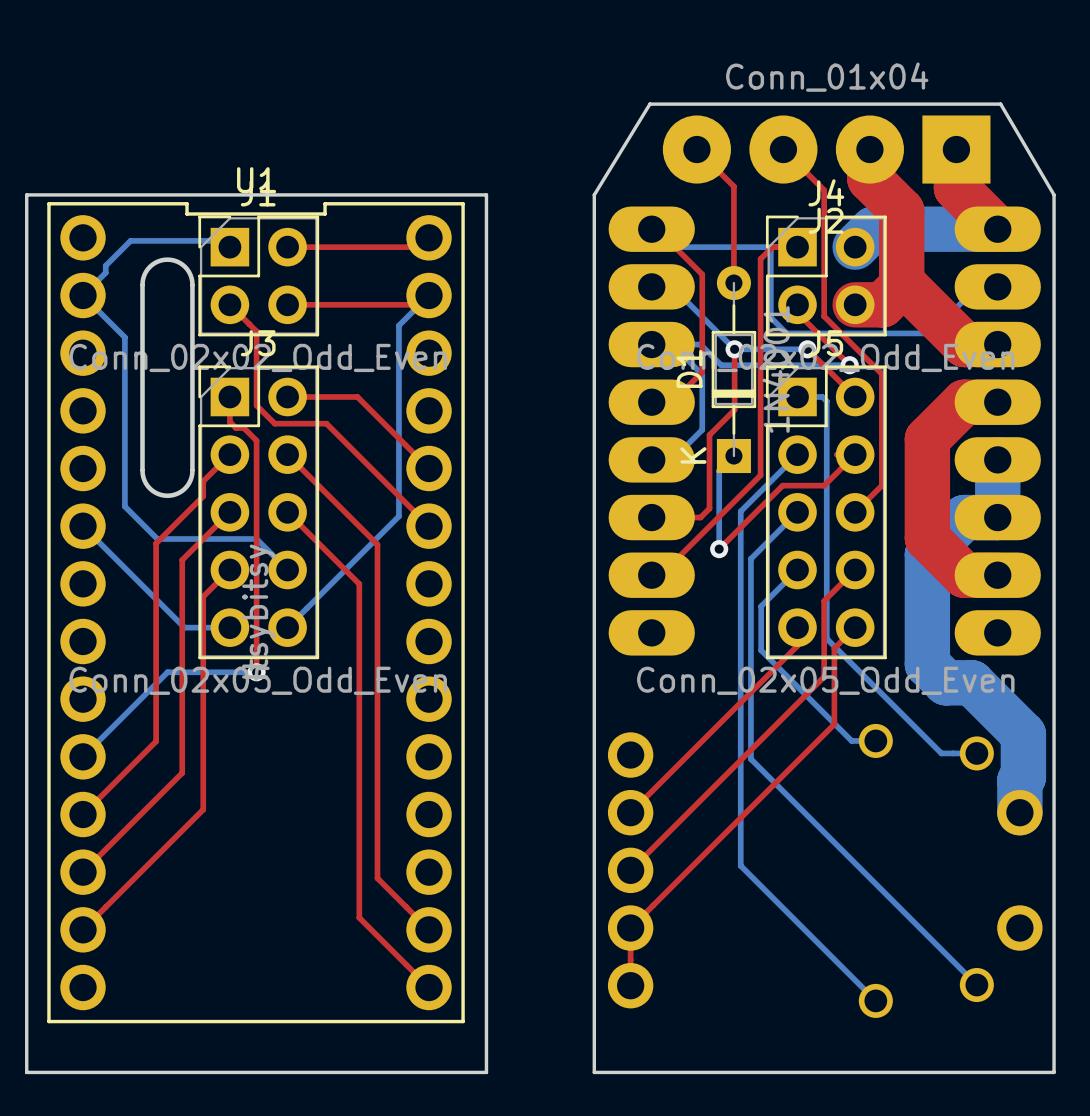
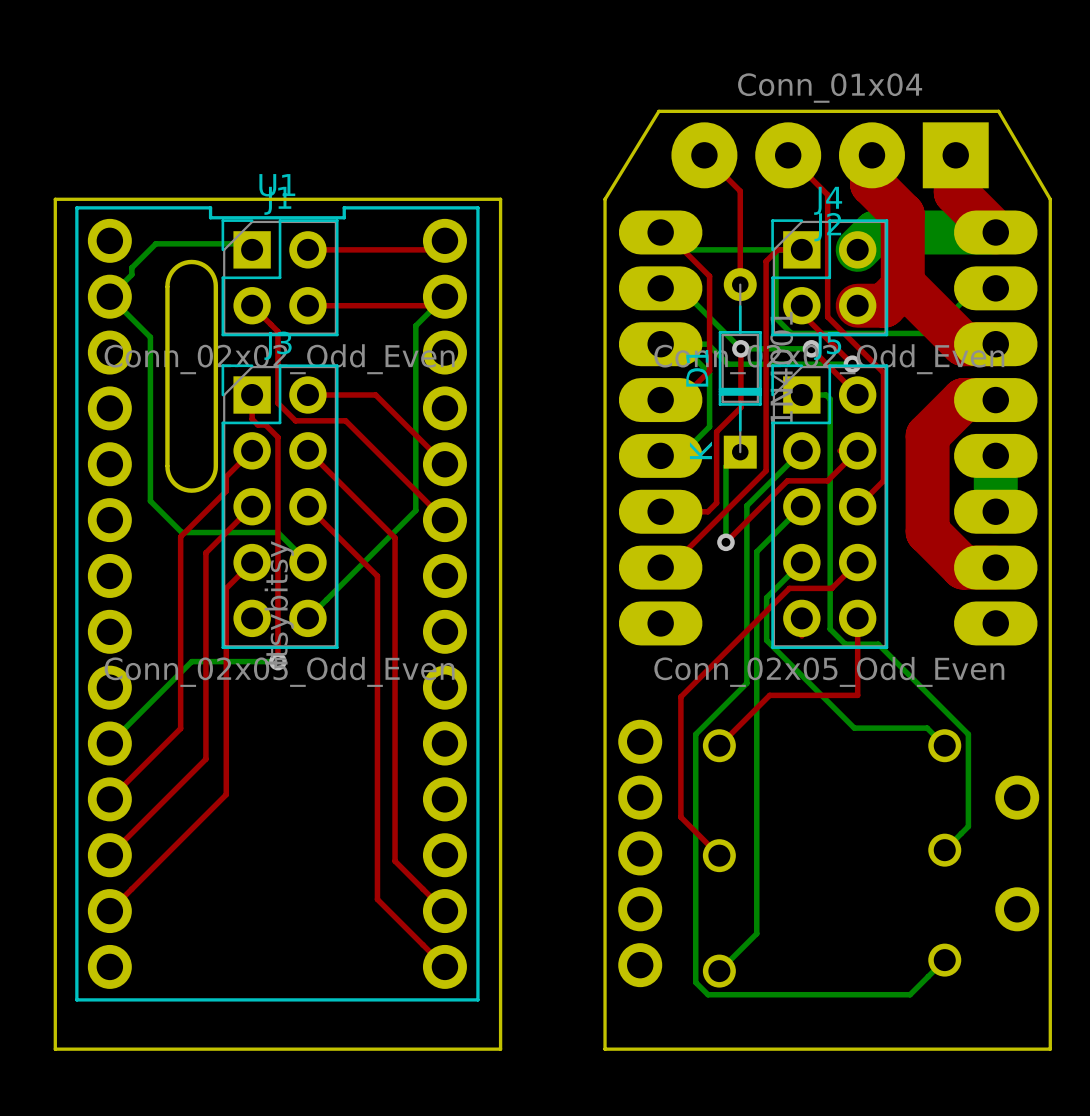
bottom track: (997, 517) (964, 517) (927, 554) (927, 664) (945, 682) (971, 682) (1023, 734) (1023, 777) (1019, 780) (1019, 812) -> none
bottom track: (83, 526) (184, 627) (229, 627) -> none
top track: (828, 596) (824, 600) (824, 676) (630, 870) -> (831, 588) (789, 588) (680, 696) (680, 817) (719, 855)
top track: (855, 627) (834, 648) (834, 724) (630, 928) (630, 985) -> (857, 618) (857, 695) (769, 695) (719, 745)
top track: (797, 645) (630, 812) -> none
bottom track: (842, 654) (941, 753) (976, 753) -> (845, 644) (878, 644) (968, 734) (968, 826) (944, 850)
bottom track: (740, 694) (740, 865) (875, 1000) -> (746, 683) (695, 734) (695, 982) (708, 994) (910, 994) (944, 960)
bottom track: none -> (877, 728) (927, 728) (944, 745)
part: (875, 740) -> none
part position: (976, 753) -> (944, 745)
part: none -> (719, 745)
bottom track: (750, 759) (976, 985) -> (756, 745) (756, 933) (719, 971)
part: none -> (944, 850)
part: none -> (719, 855)
part position: (976, 985) -> (944, 960)
part: none -> (719, 971)
part: (875, 1000) -> none

